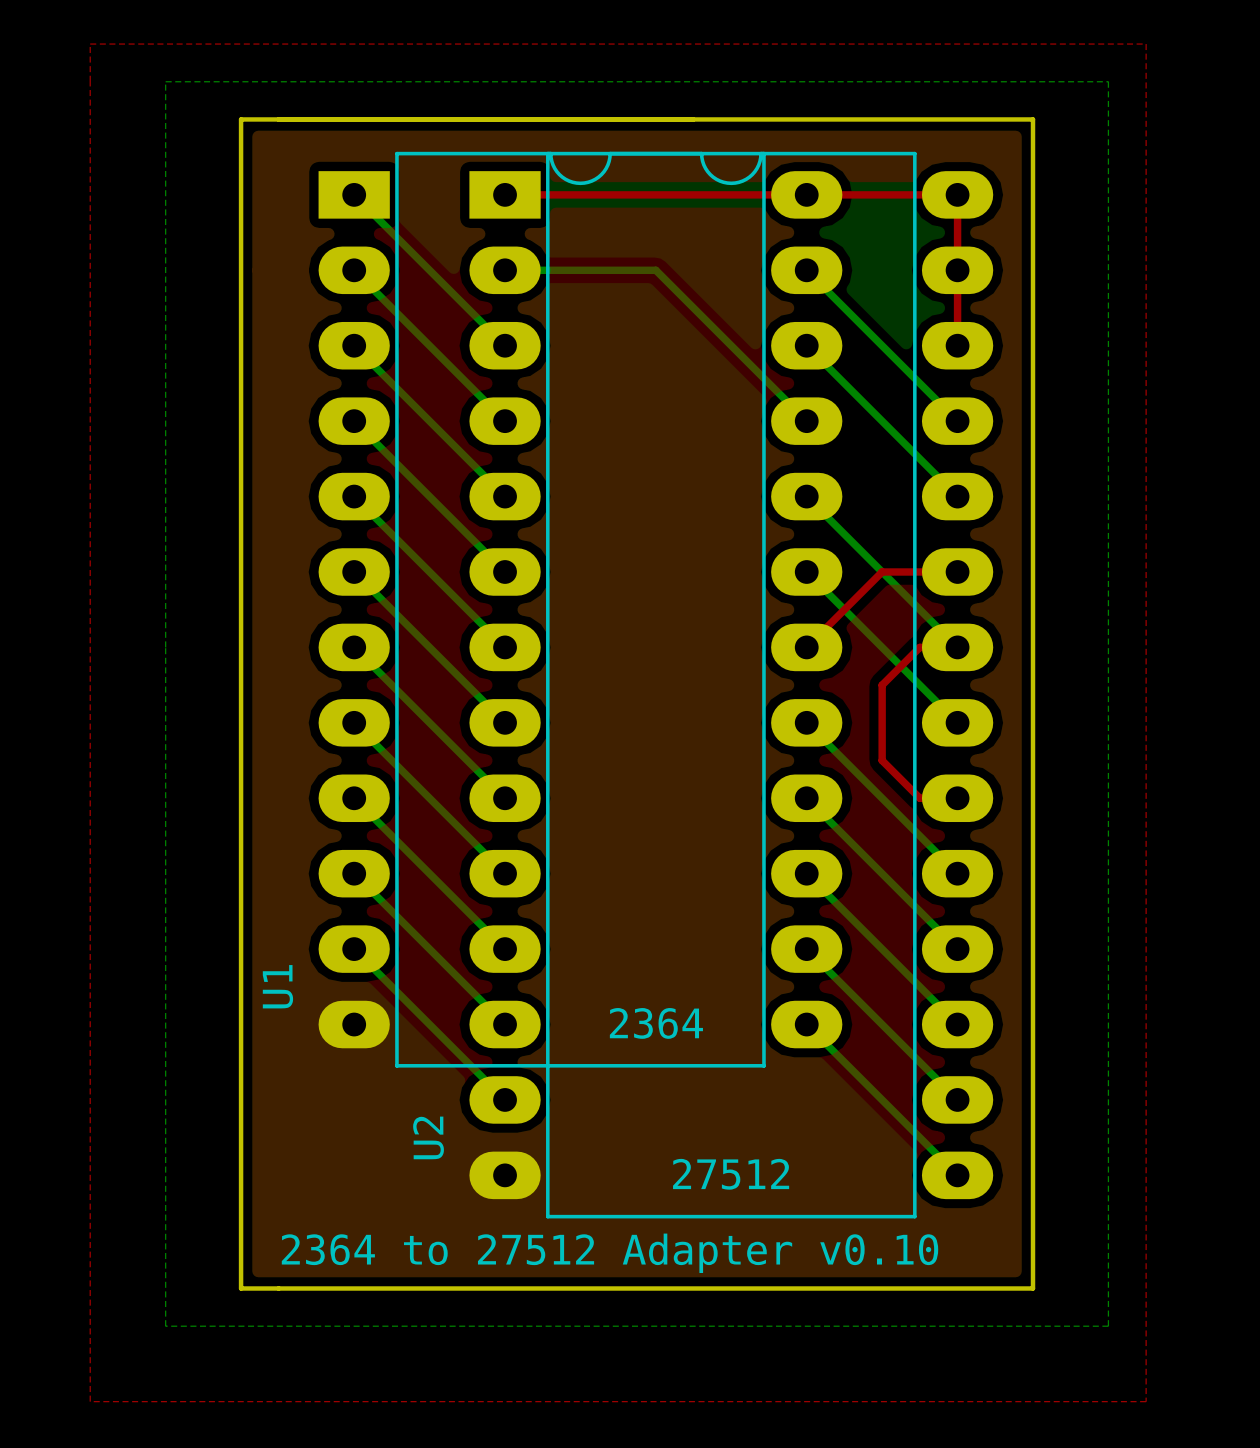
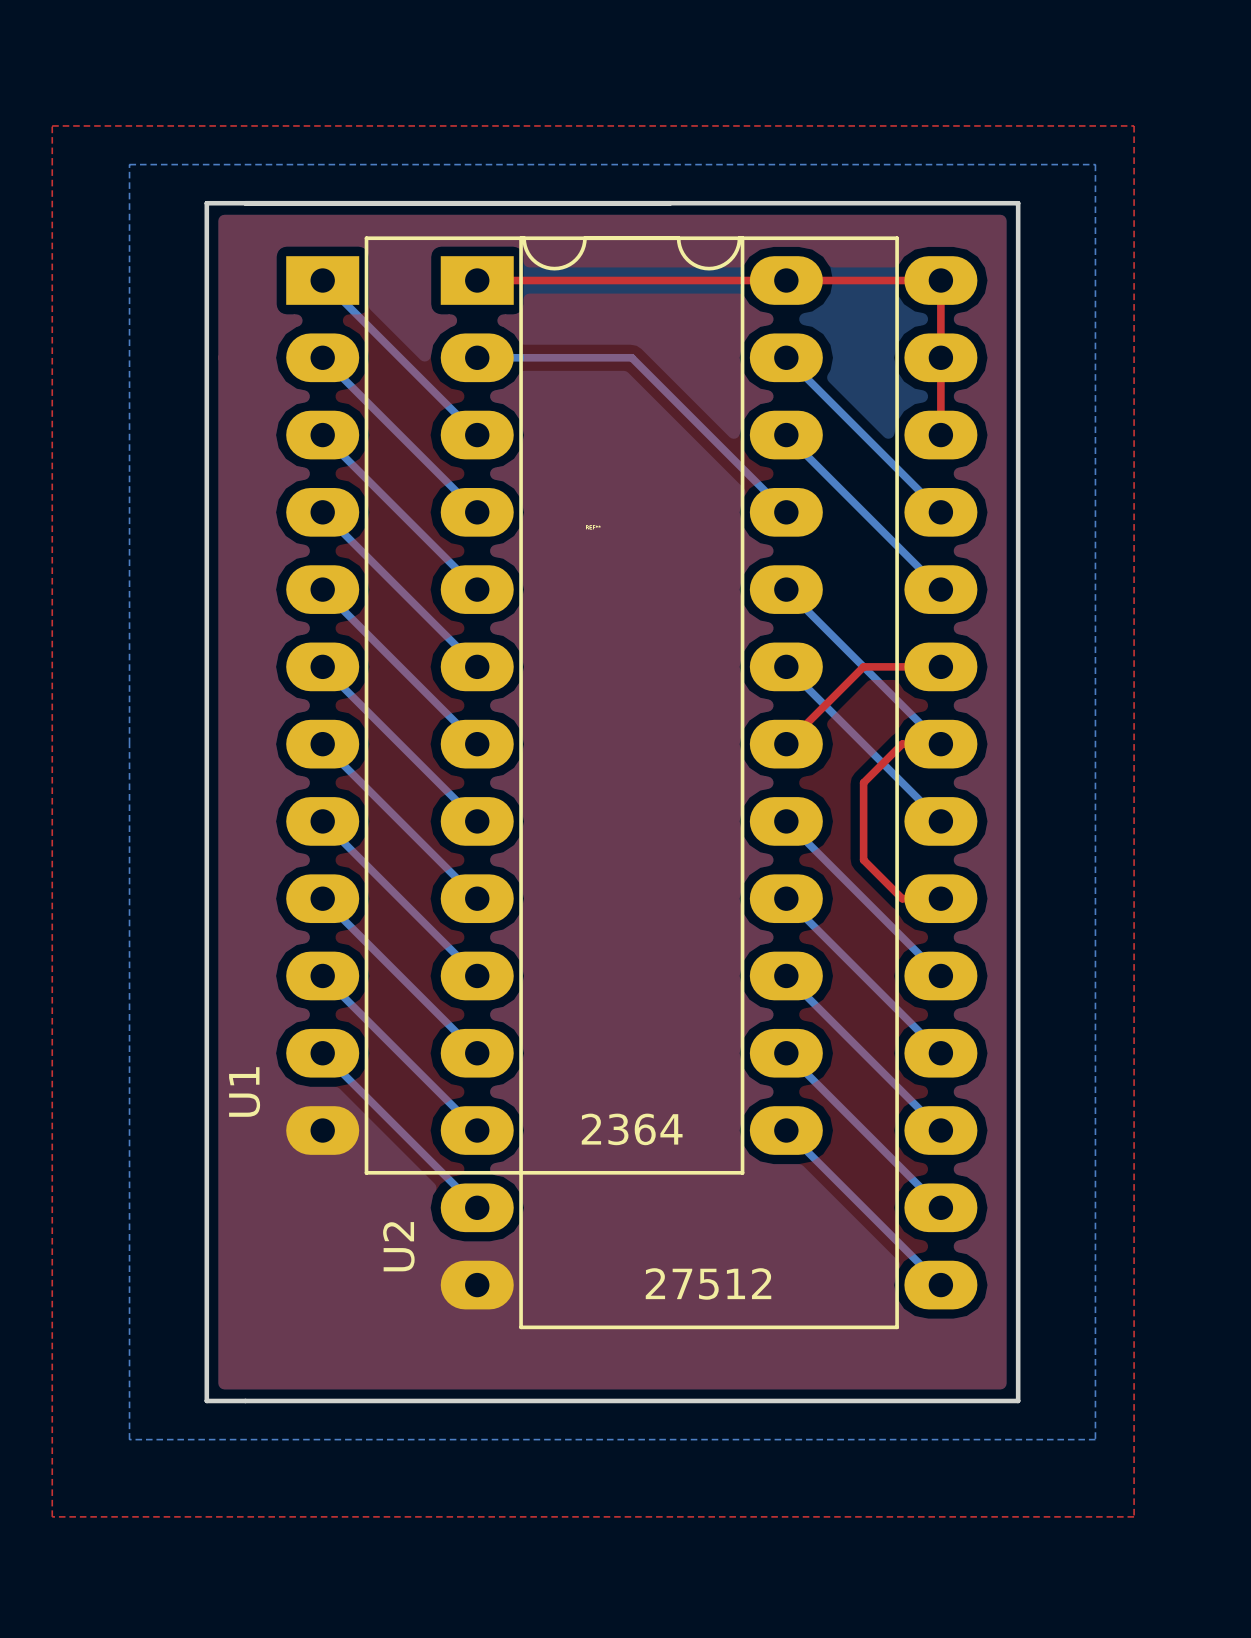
part: none -> (593, 527)
text: 2364 to 27512 Adapter v0.10 (610, 1253) -> none

